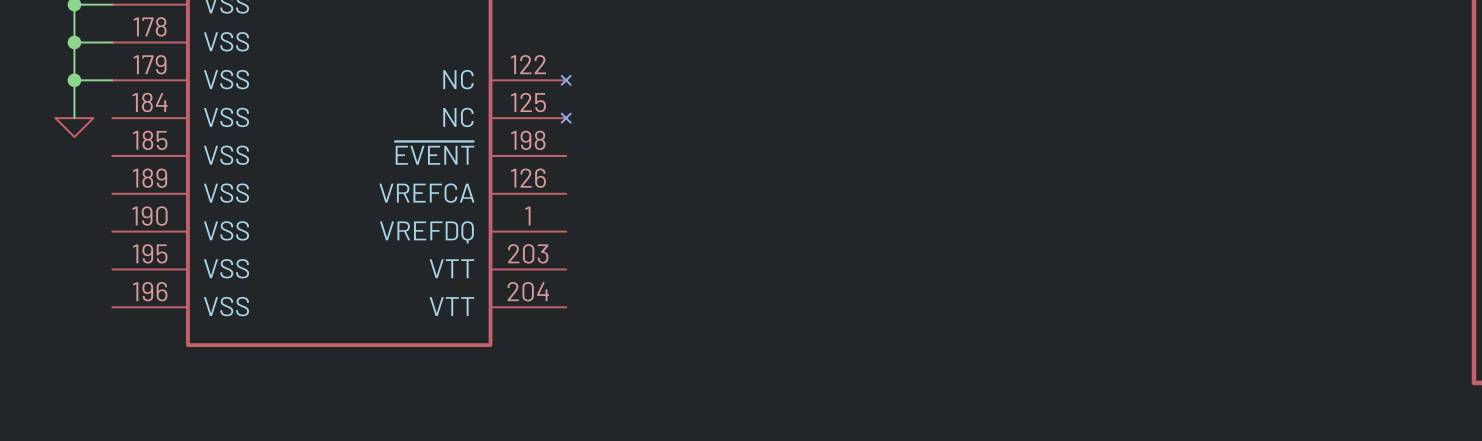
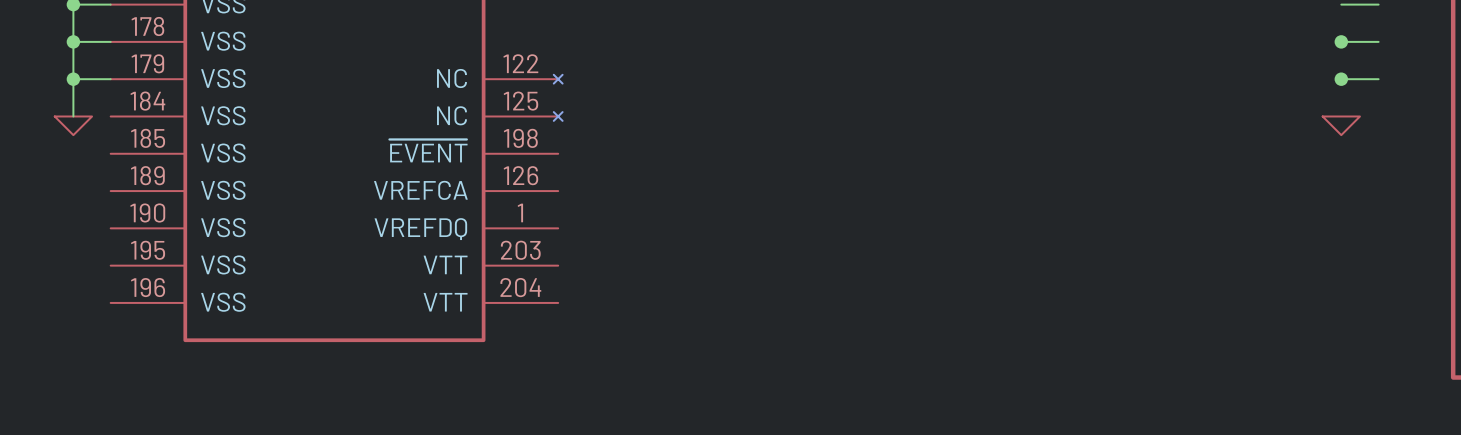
wire: none -> (1341, 4) (1378, 4)
wire: none -> (1341, 41) (1378, 41)
junction: none -> (1341, 41)
wire: none -> (1341, 79) (1378, 79)
junction: none -> (1341, 79)
power symbol: none -> (1341, 125)

